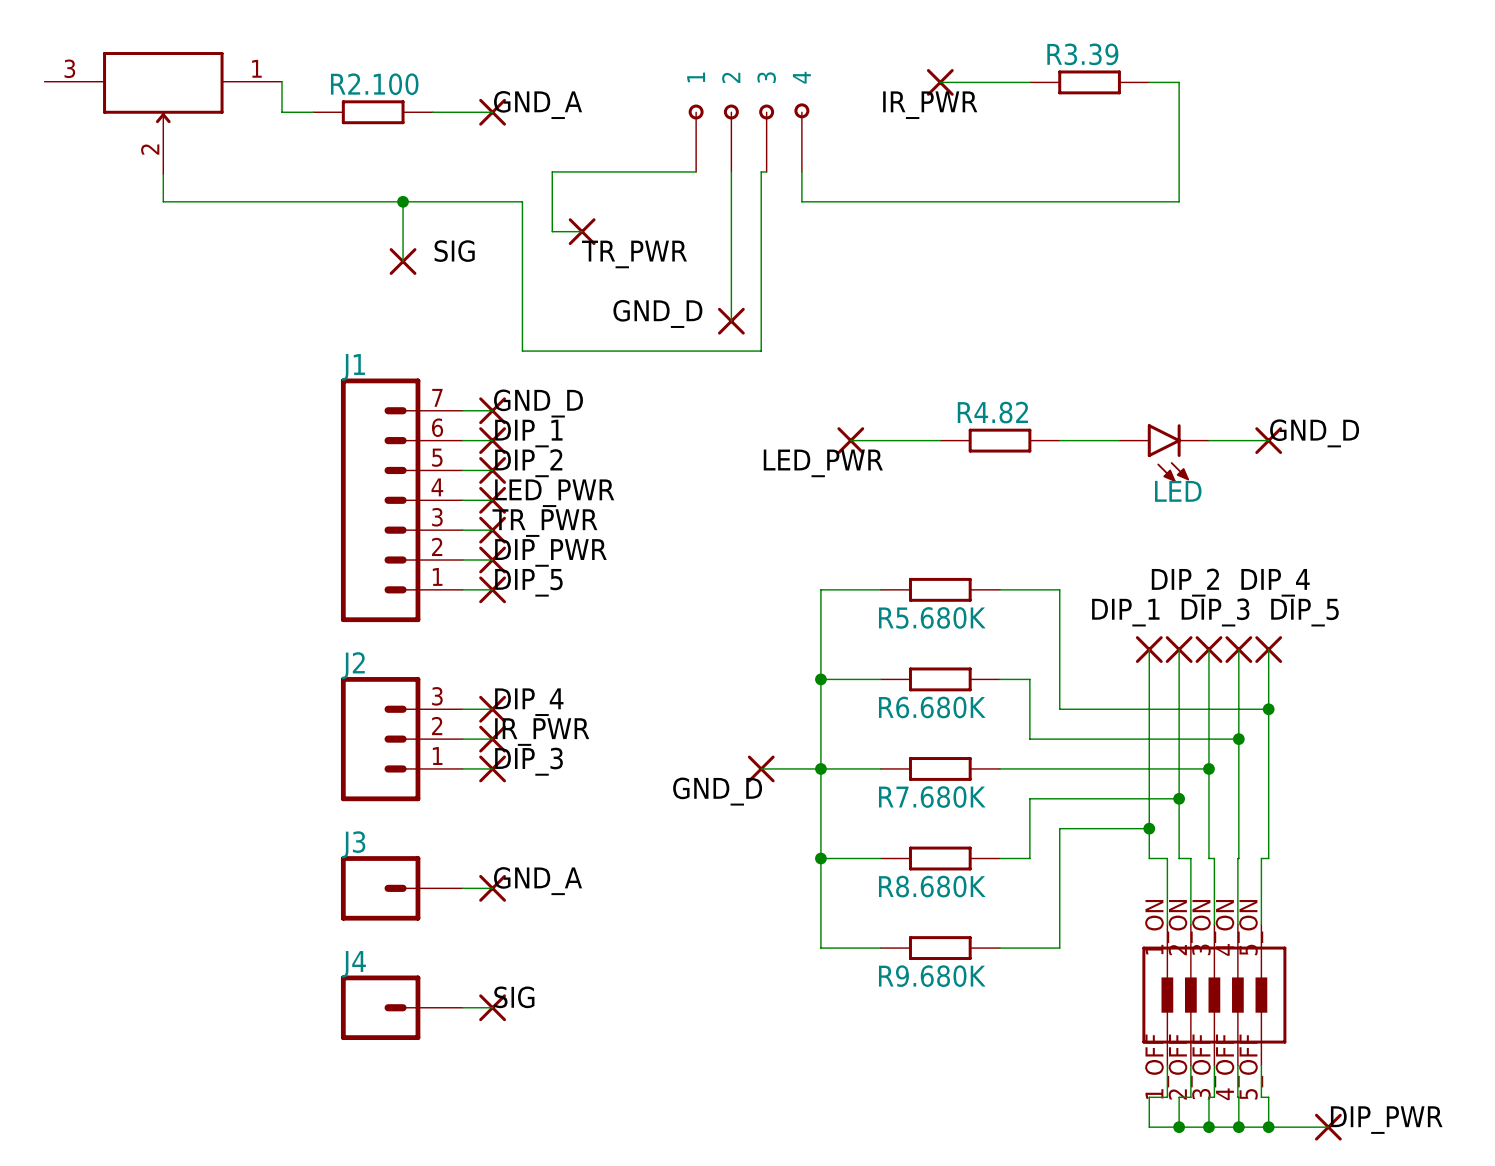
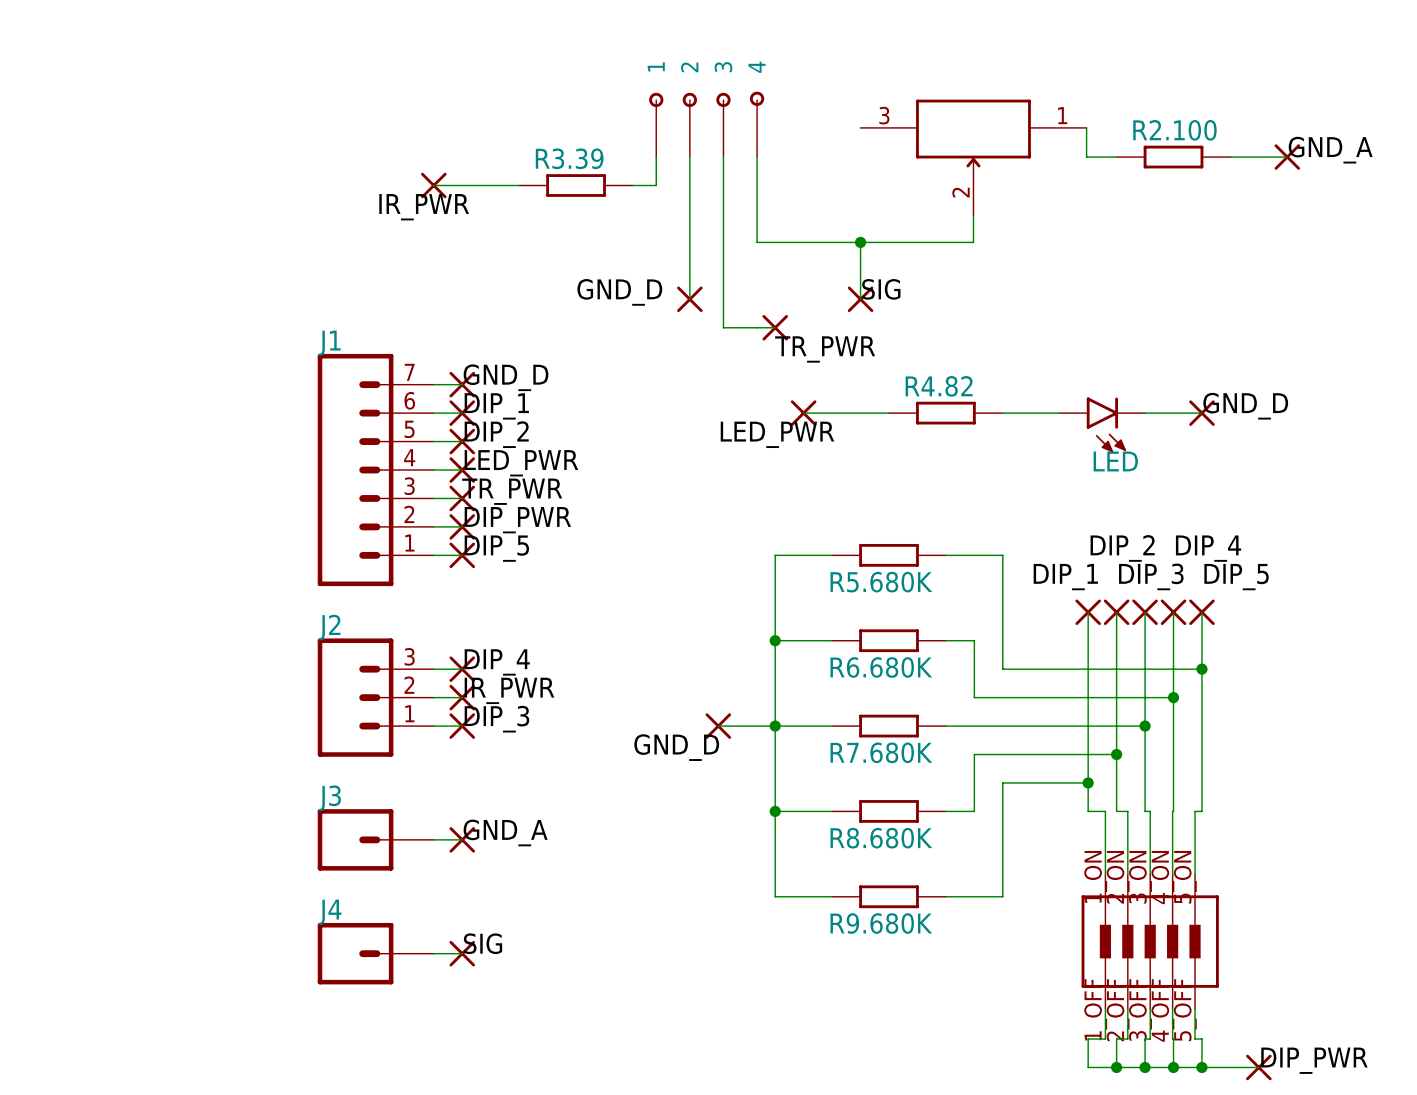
wire: (281, 81) (281, 112) (313, 112) -> none
wire: (940, 82) (1029, 82) -> none
part: (940, 82) -> none
R3.39 position: (1089, 82) -> (576, 185)
wire: (1149, 82) (1179, 82) (1179, 201) (801, 201) -> (973, 216) (973, 242) (757, 242) (757, 185)
label: GND_A (538, 105) -> none
label: IR_PWR (930, 105) -> none
R2.100 position: (373, 112) -> (1173, 157)
wire: (432, 112) (492, 112) -> none
part: (492, 112) -> none
part: (163, 113) -> none
wire: none -> (1086, 127) (1086, 157) (1116, 157)
label: none -> GND_A (1330, 150)
wire: (696, 171) (552, 171) (552, 231) (582, 231) -> (656, 157) (656, 185) (632, 185)
wire: (766, 171) (761, 171) (761, 351) (522, 351) (522, 201) -> (519, 185) (490, 185)
wire: none -> (723, 157) (723, 327) (775, 327)
wire: none -> (1230, 157) (1287, 157)
part: none -> (1287, 157)
part: none -> (973, 158)
wire: (163, 174) (163, 201) (462, 201) -> none
wire: (403, 201) (403, 261) -> none
junction: (403, 201) -> none
part: none -> (433, 185)
label: none -> IR_PWR (424, 207)
part: (582, 231) -> none
label: SIG (454, 251) -> none
label position: TR_PWR (634, 254) -> TR_PWR (825, 349)
part: (403, 261) -> none
wire: none -> (860, 242) (860, 299)
junction: none -> (860, 242)
label: none -> SIG (881, 289)
part: none -> (860, 299)
part: none -> (775, 327)

